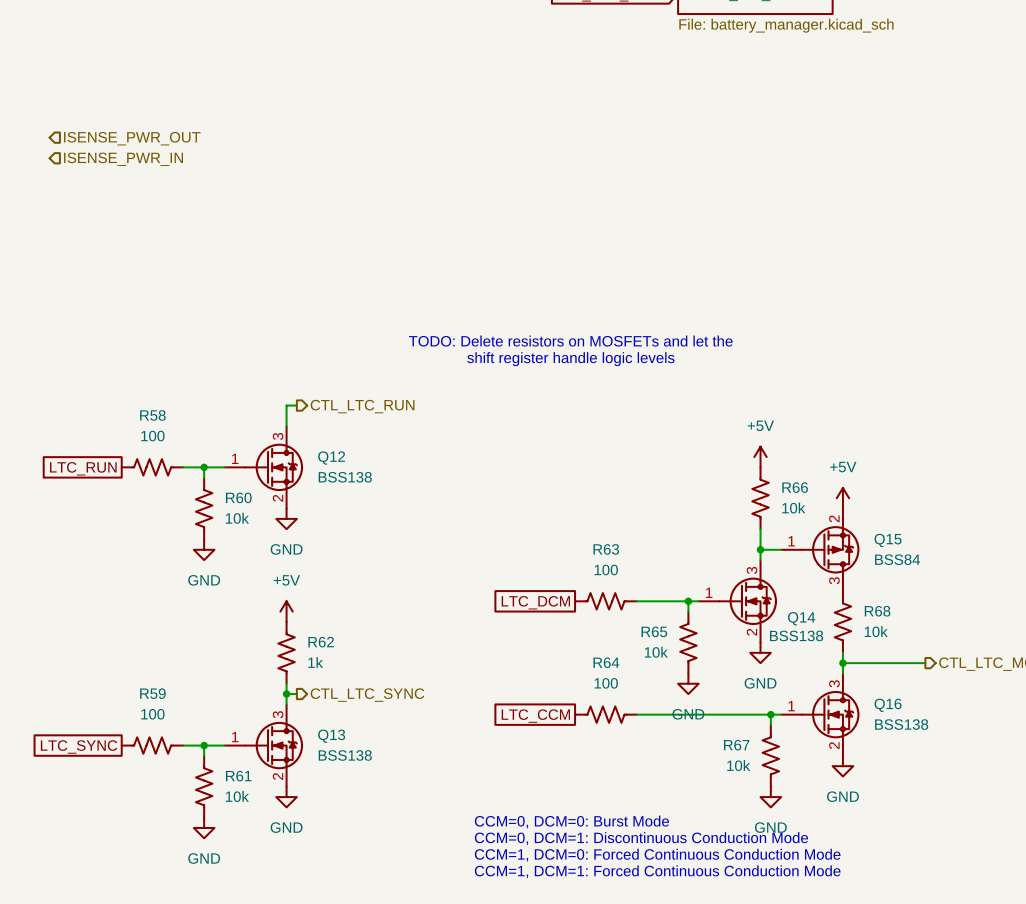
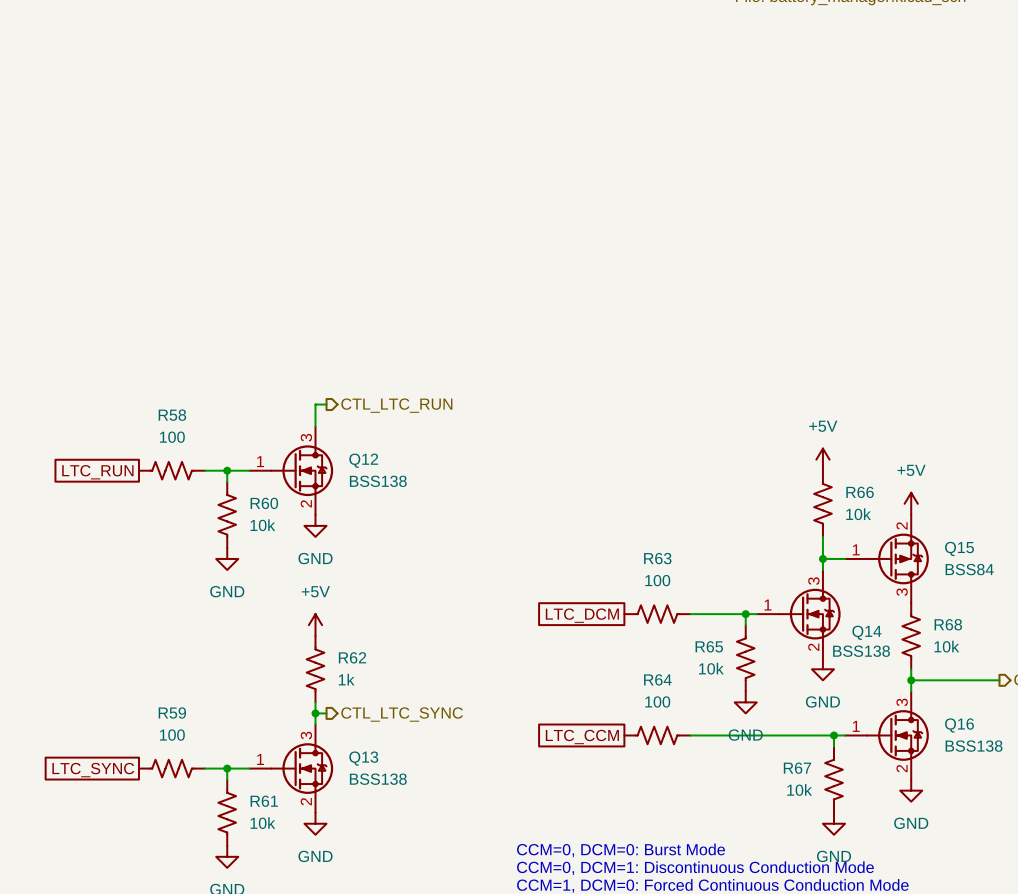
hierarchical label: ISENSE_PWR_OUT (132, 138) -> none
hierarchical label: ISENSE_PWR_IN (123, 159) -> none
text: TODO: Delete resistors on MOSFETs and let the (570, 341) -> none
text: shift register handle logic levels (570, 359) -> none

